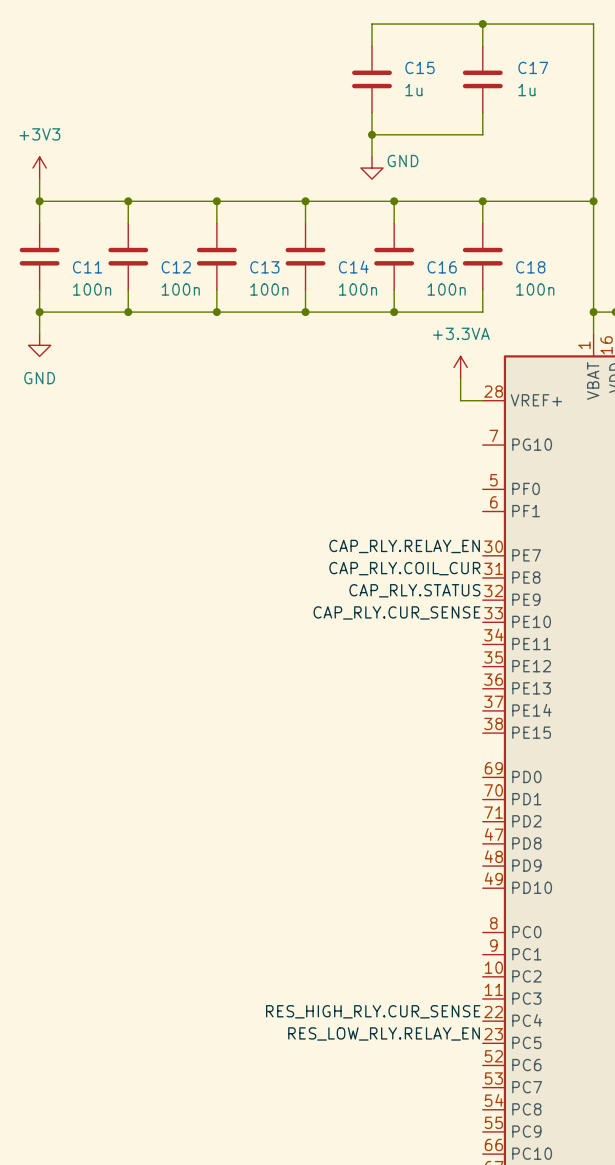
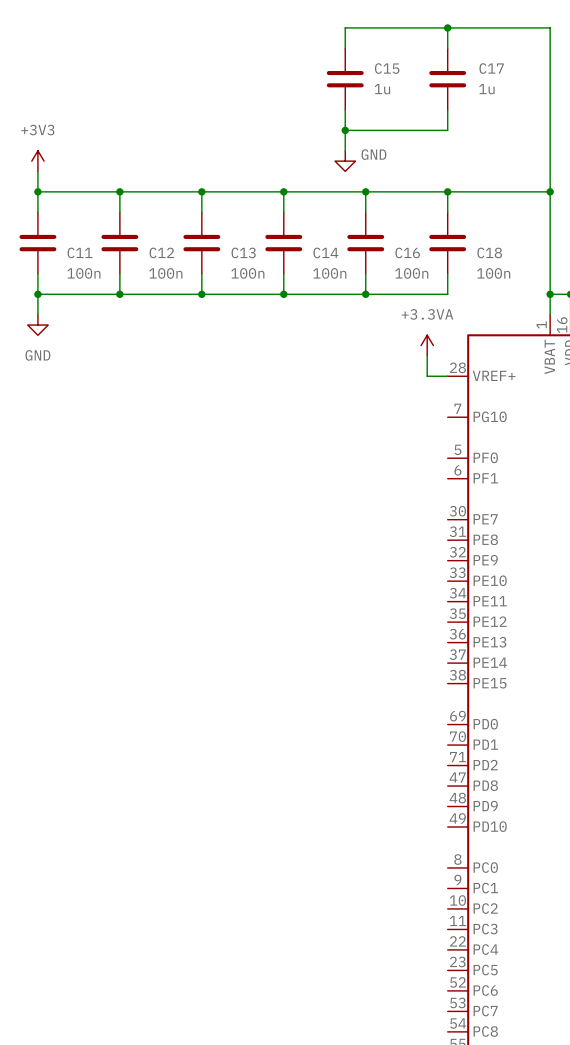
label: CAP_RLY.RELAY_EN (404, 546) -> none
label: CAP_RLY.COIL_CUR (404, 568) -> none
label: CAP_RLY.STATUS (414, 590) -> none
label: CAP_RLY.CUR_SENSE (396, 612) -> none
label: RES_HIGH_RLY.CUR_SENSE (373, 1011) -> none
label: RES_LOW_RLY.RELAY_EN (384, 1033) -> none

